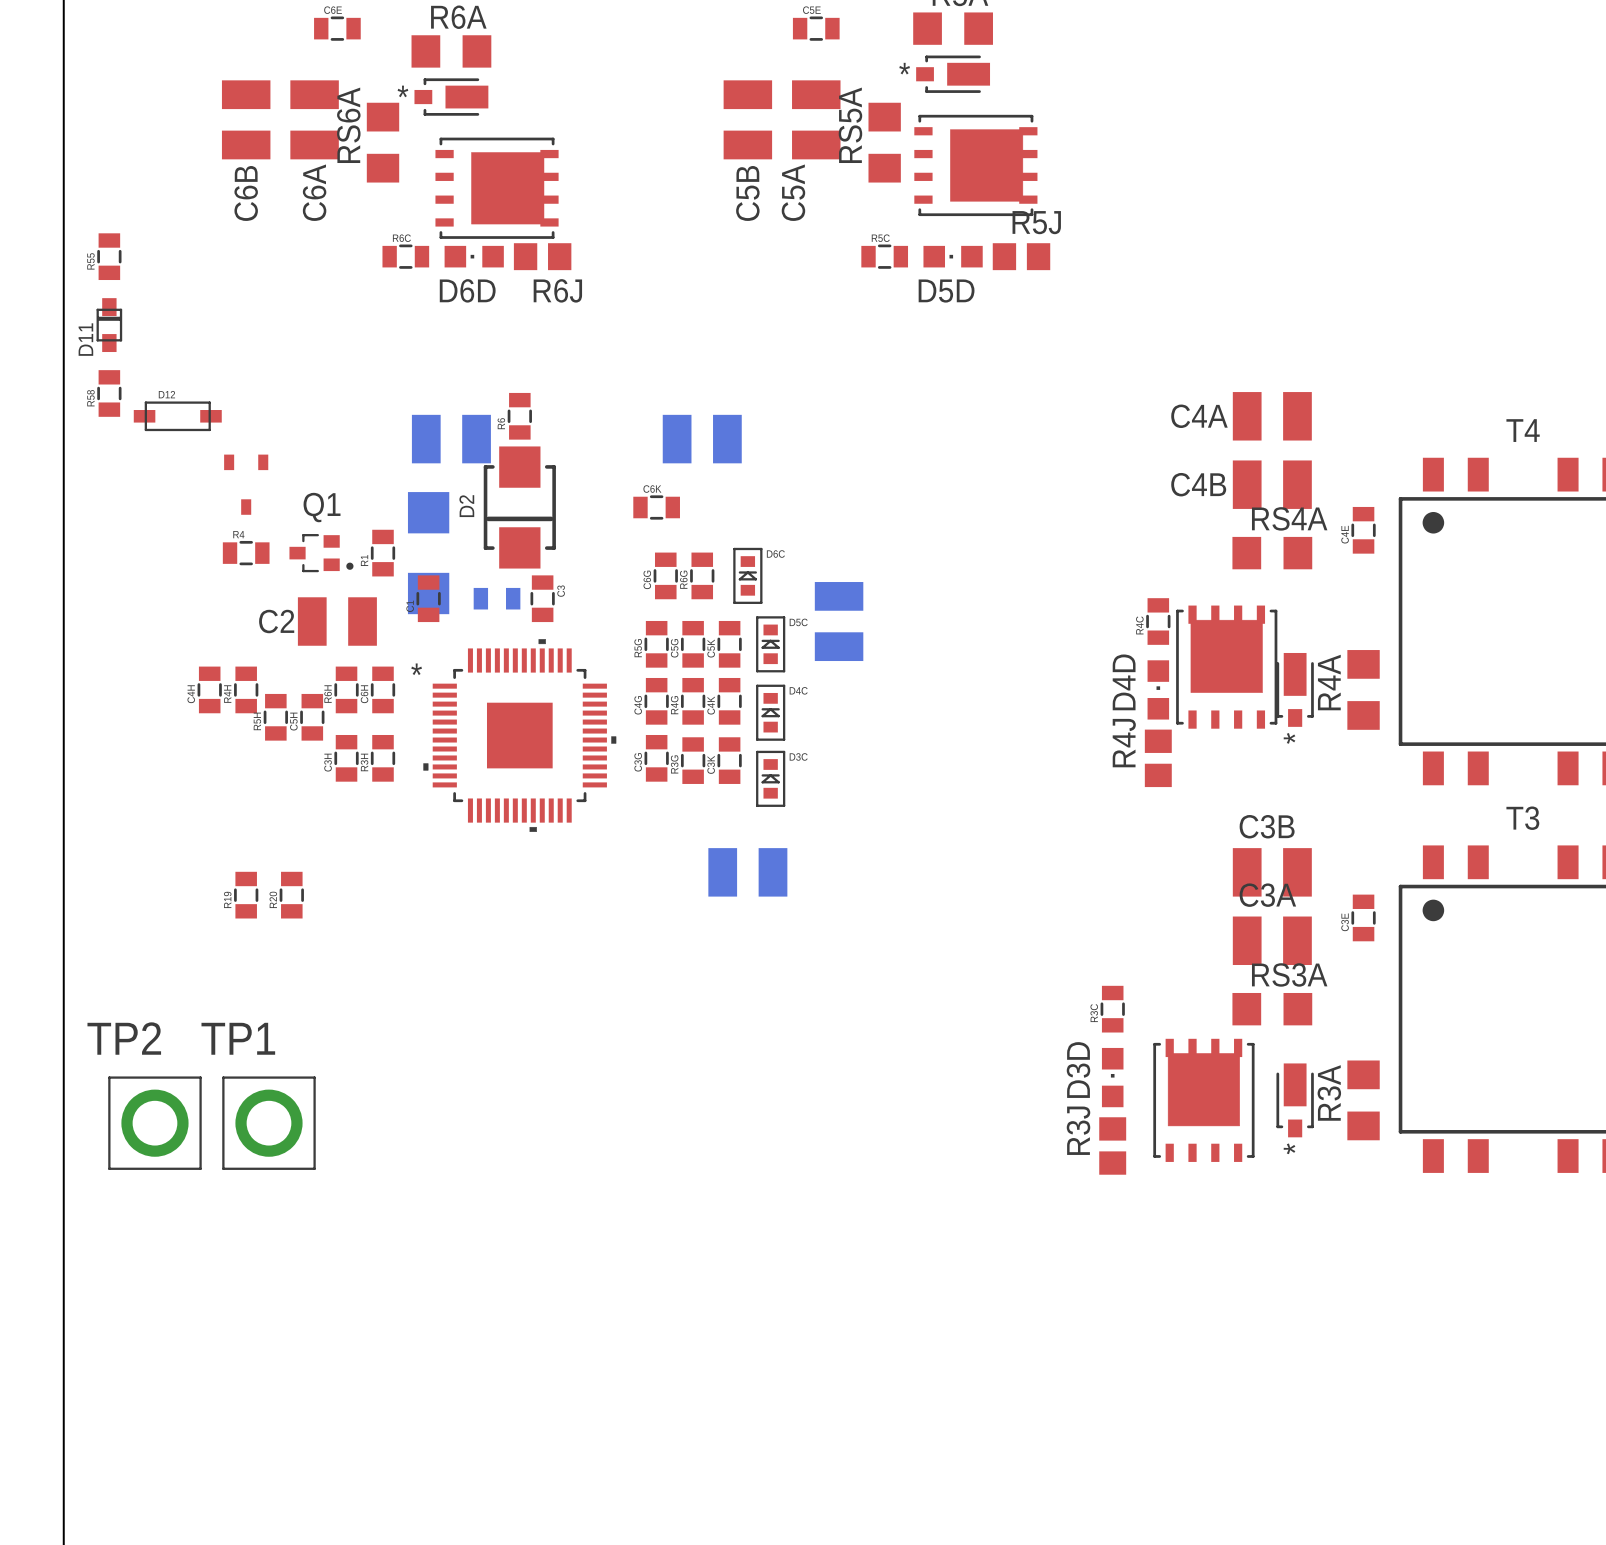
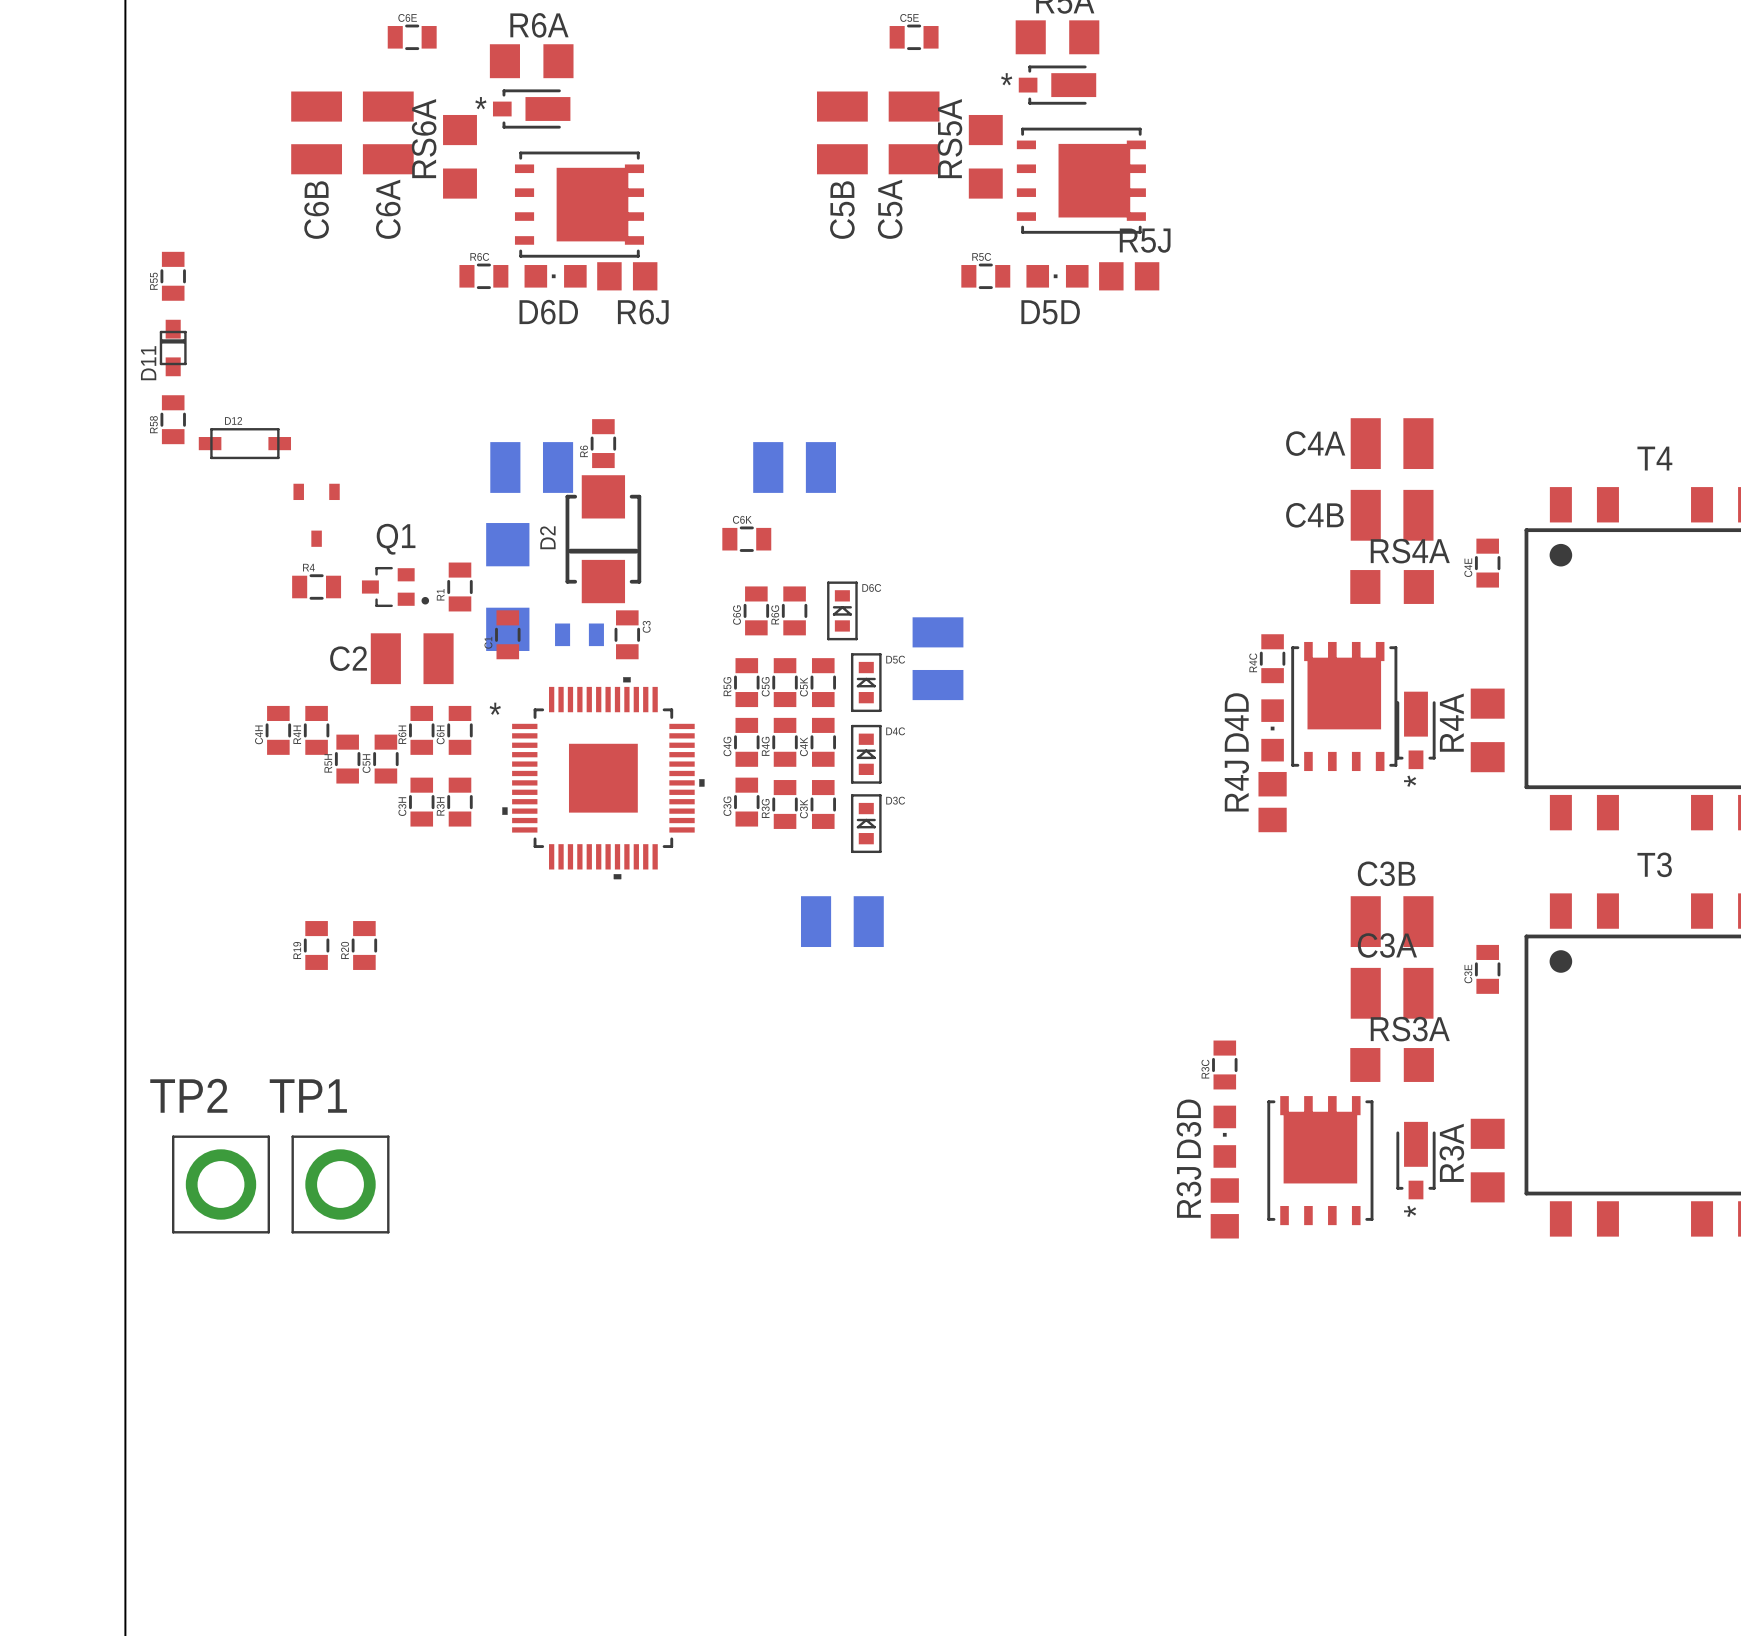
part footprint: [914, 114, 1038, 217] -> [1016, 127, 1146, 234]
part footprint: [435, 137, 559, 239] -> [514, 151, 645, 258]
part footprint: [1176, 605, 1278, 729] -> [1291, 641, 1398, 772]
part footprint: [1153, 1038, 1255, 1162] -> [1267, 1096, 1374, 1226]

